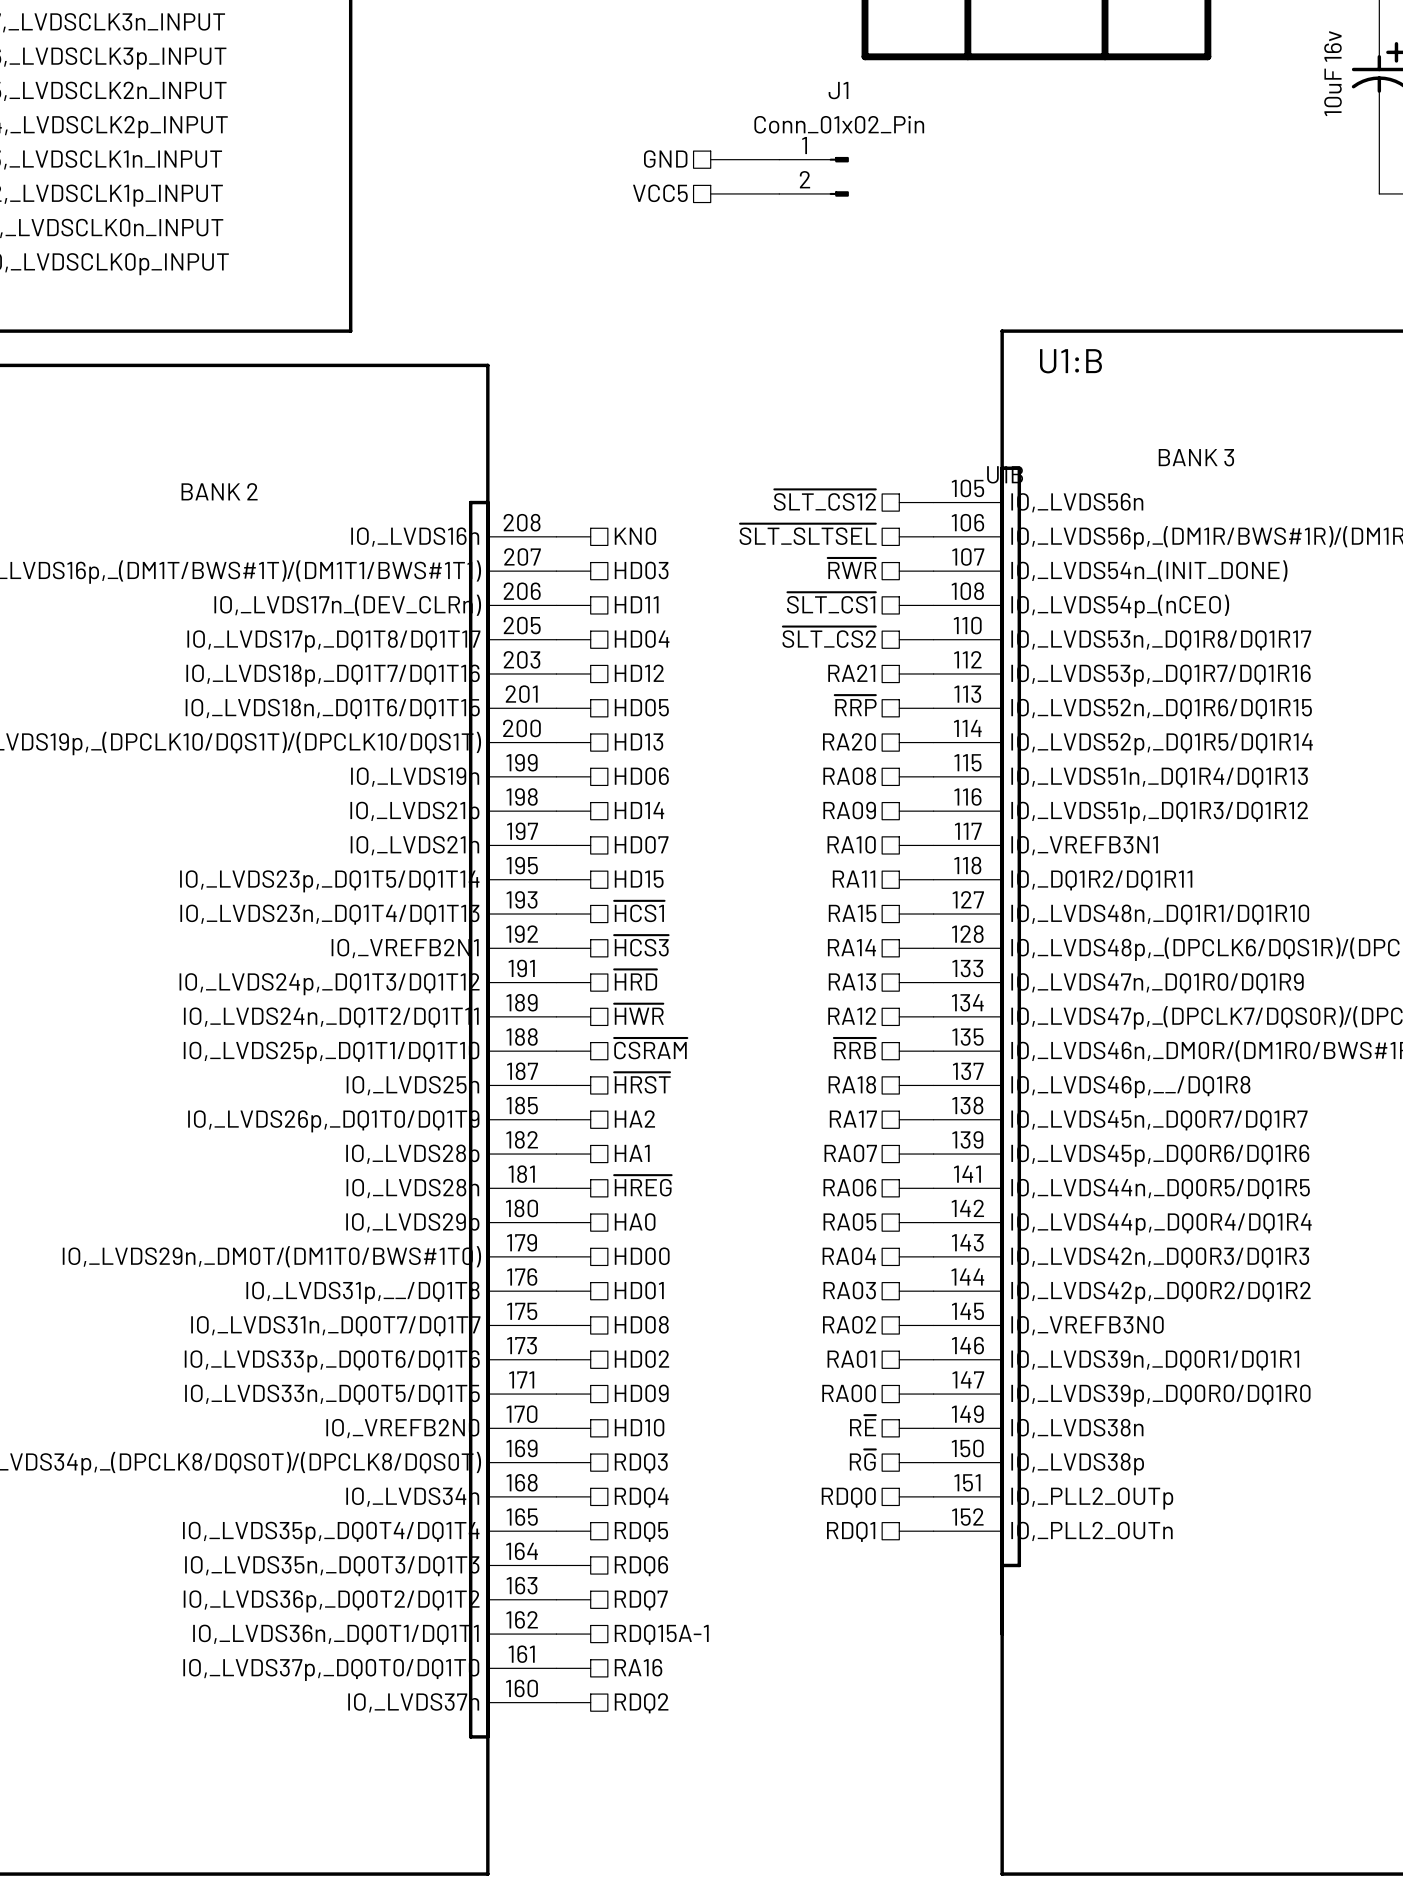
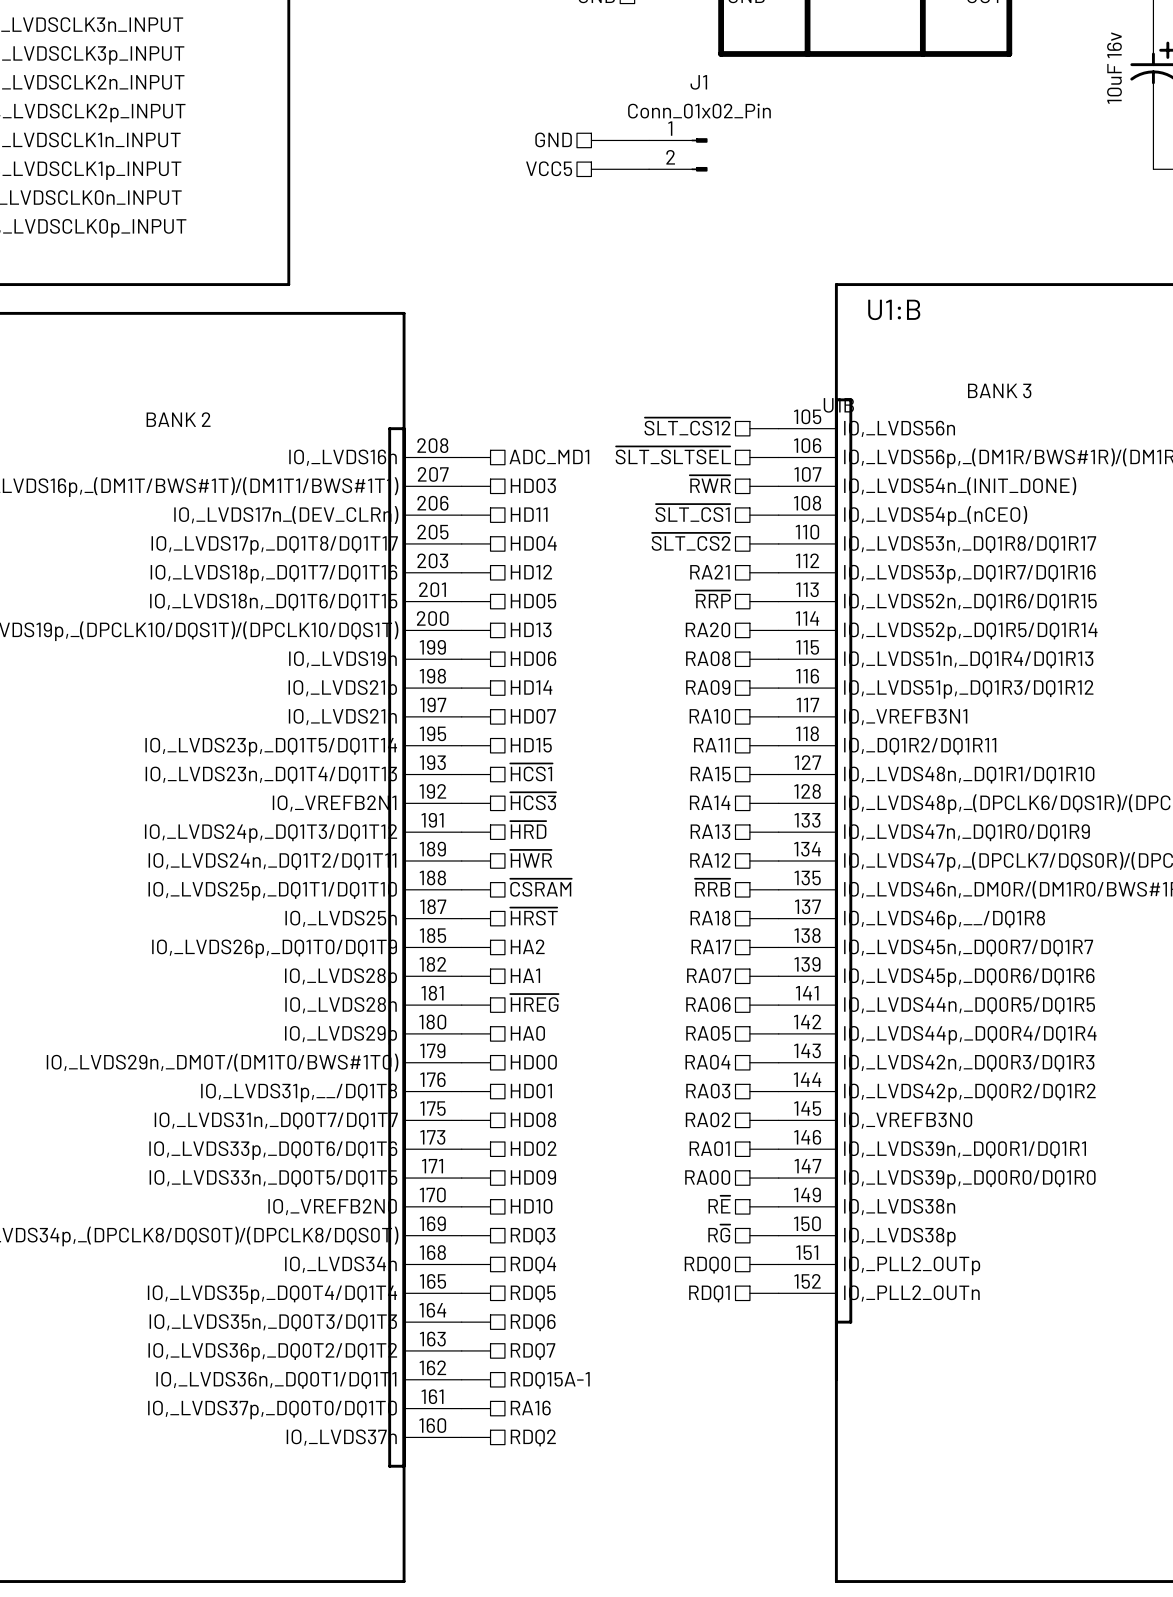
hierarchical label: KN0 (635, 536) -> ADC_MD1 (549, 456)

